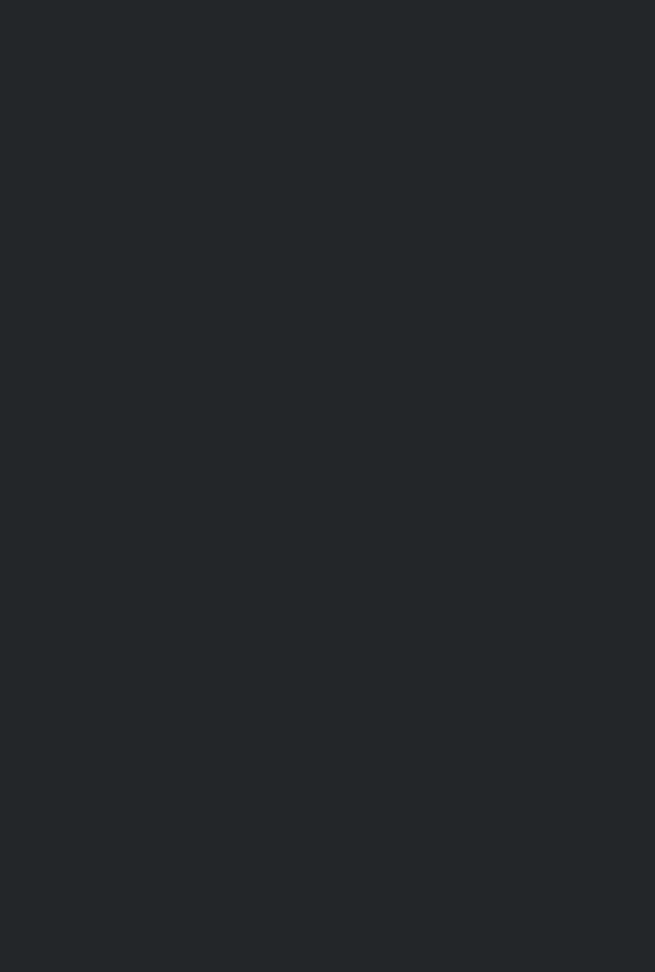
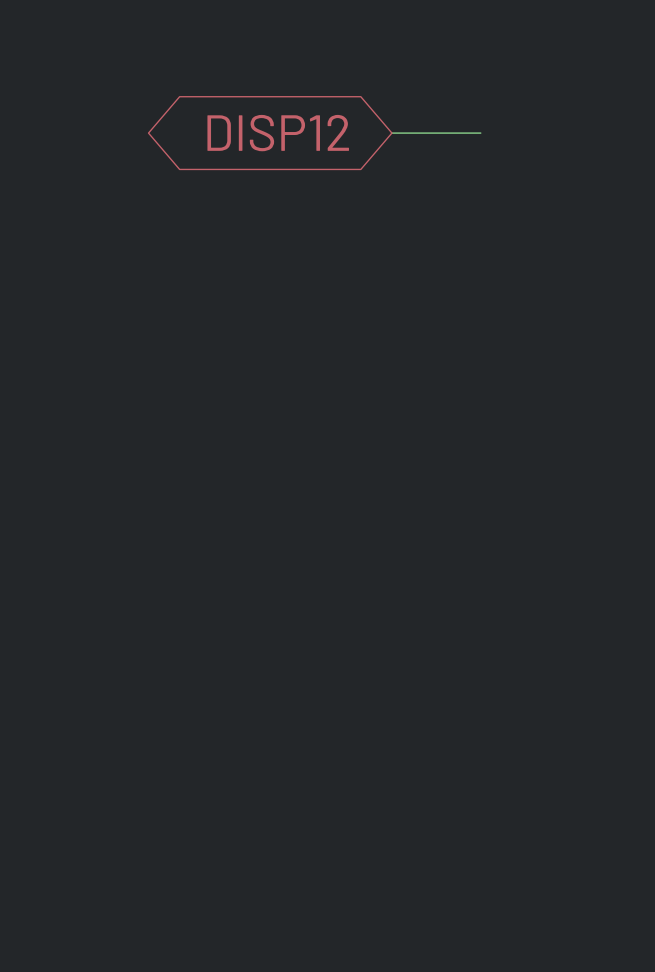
global label: none -> DISP12 (278, 133)
wire: none -> (391, 133) (480, 133)

